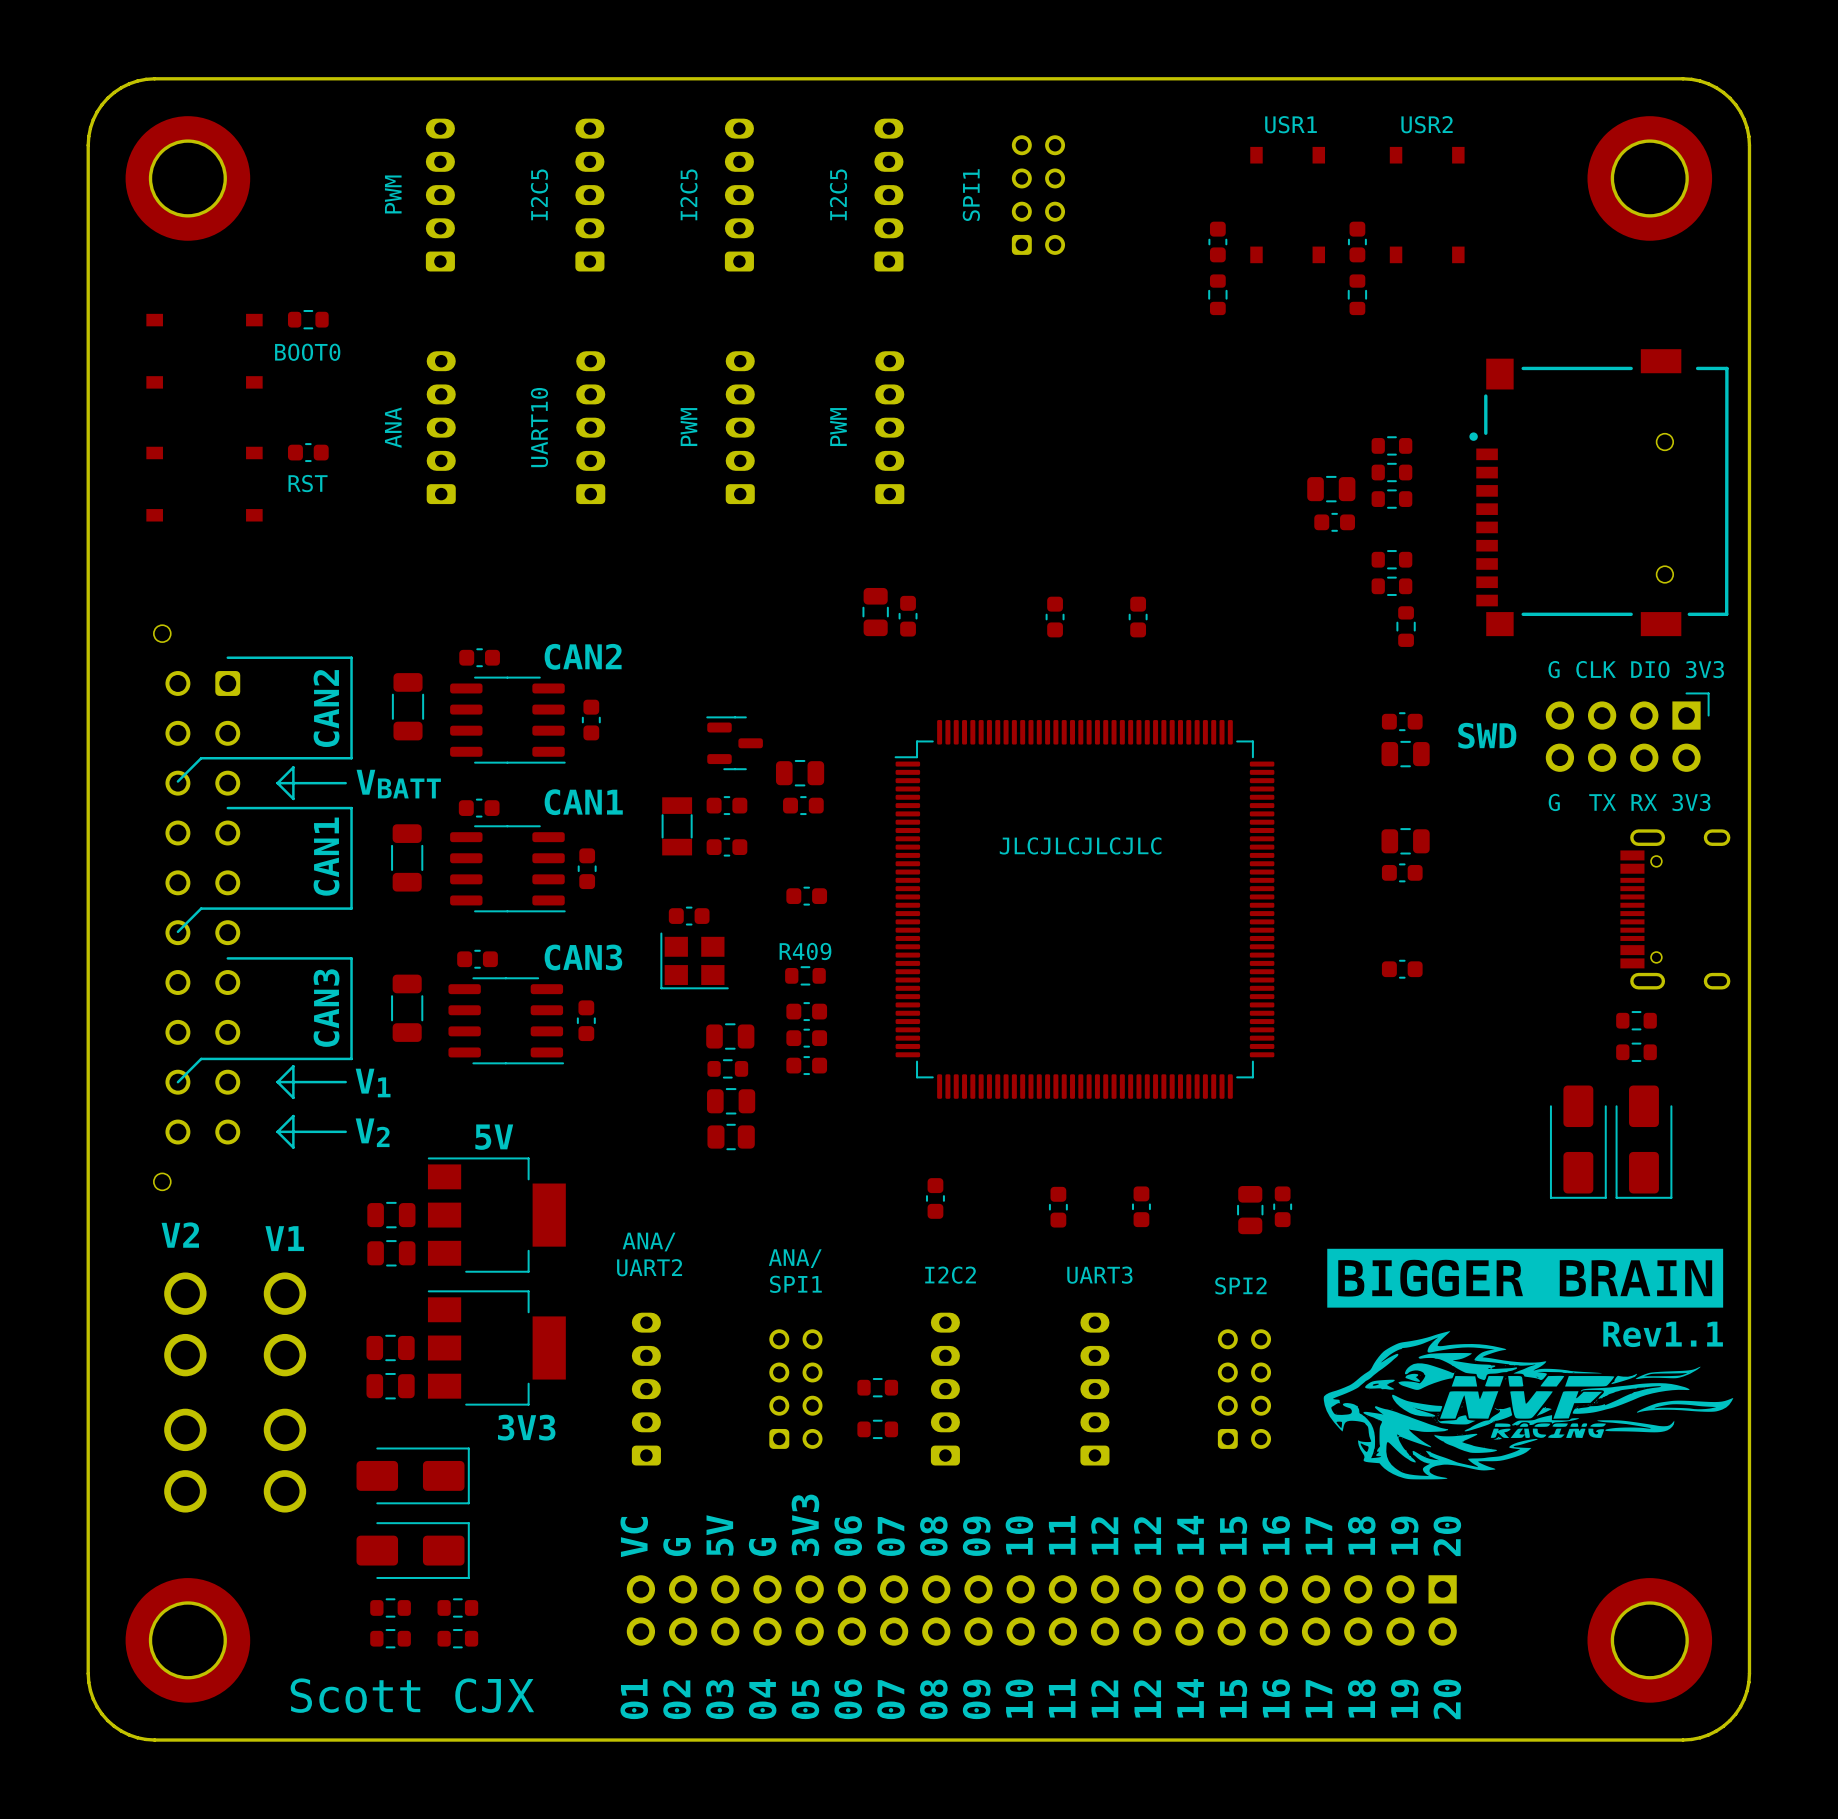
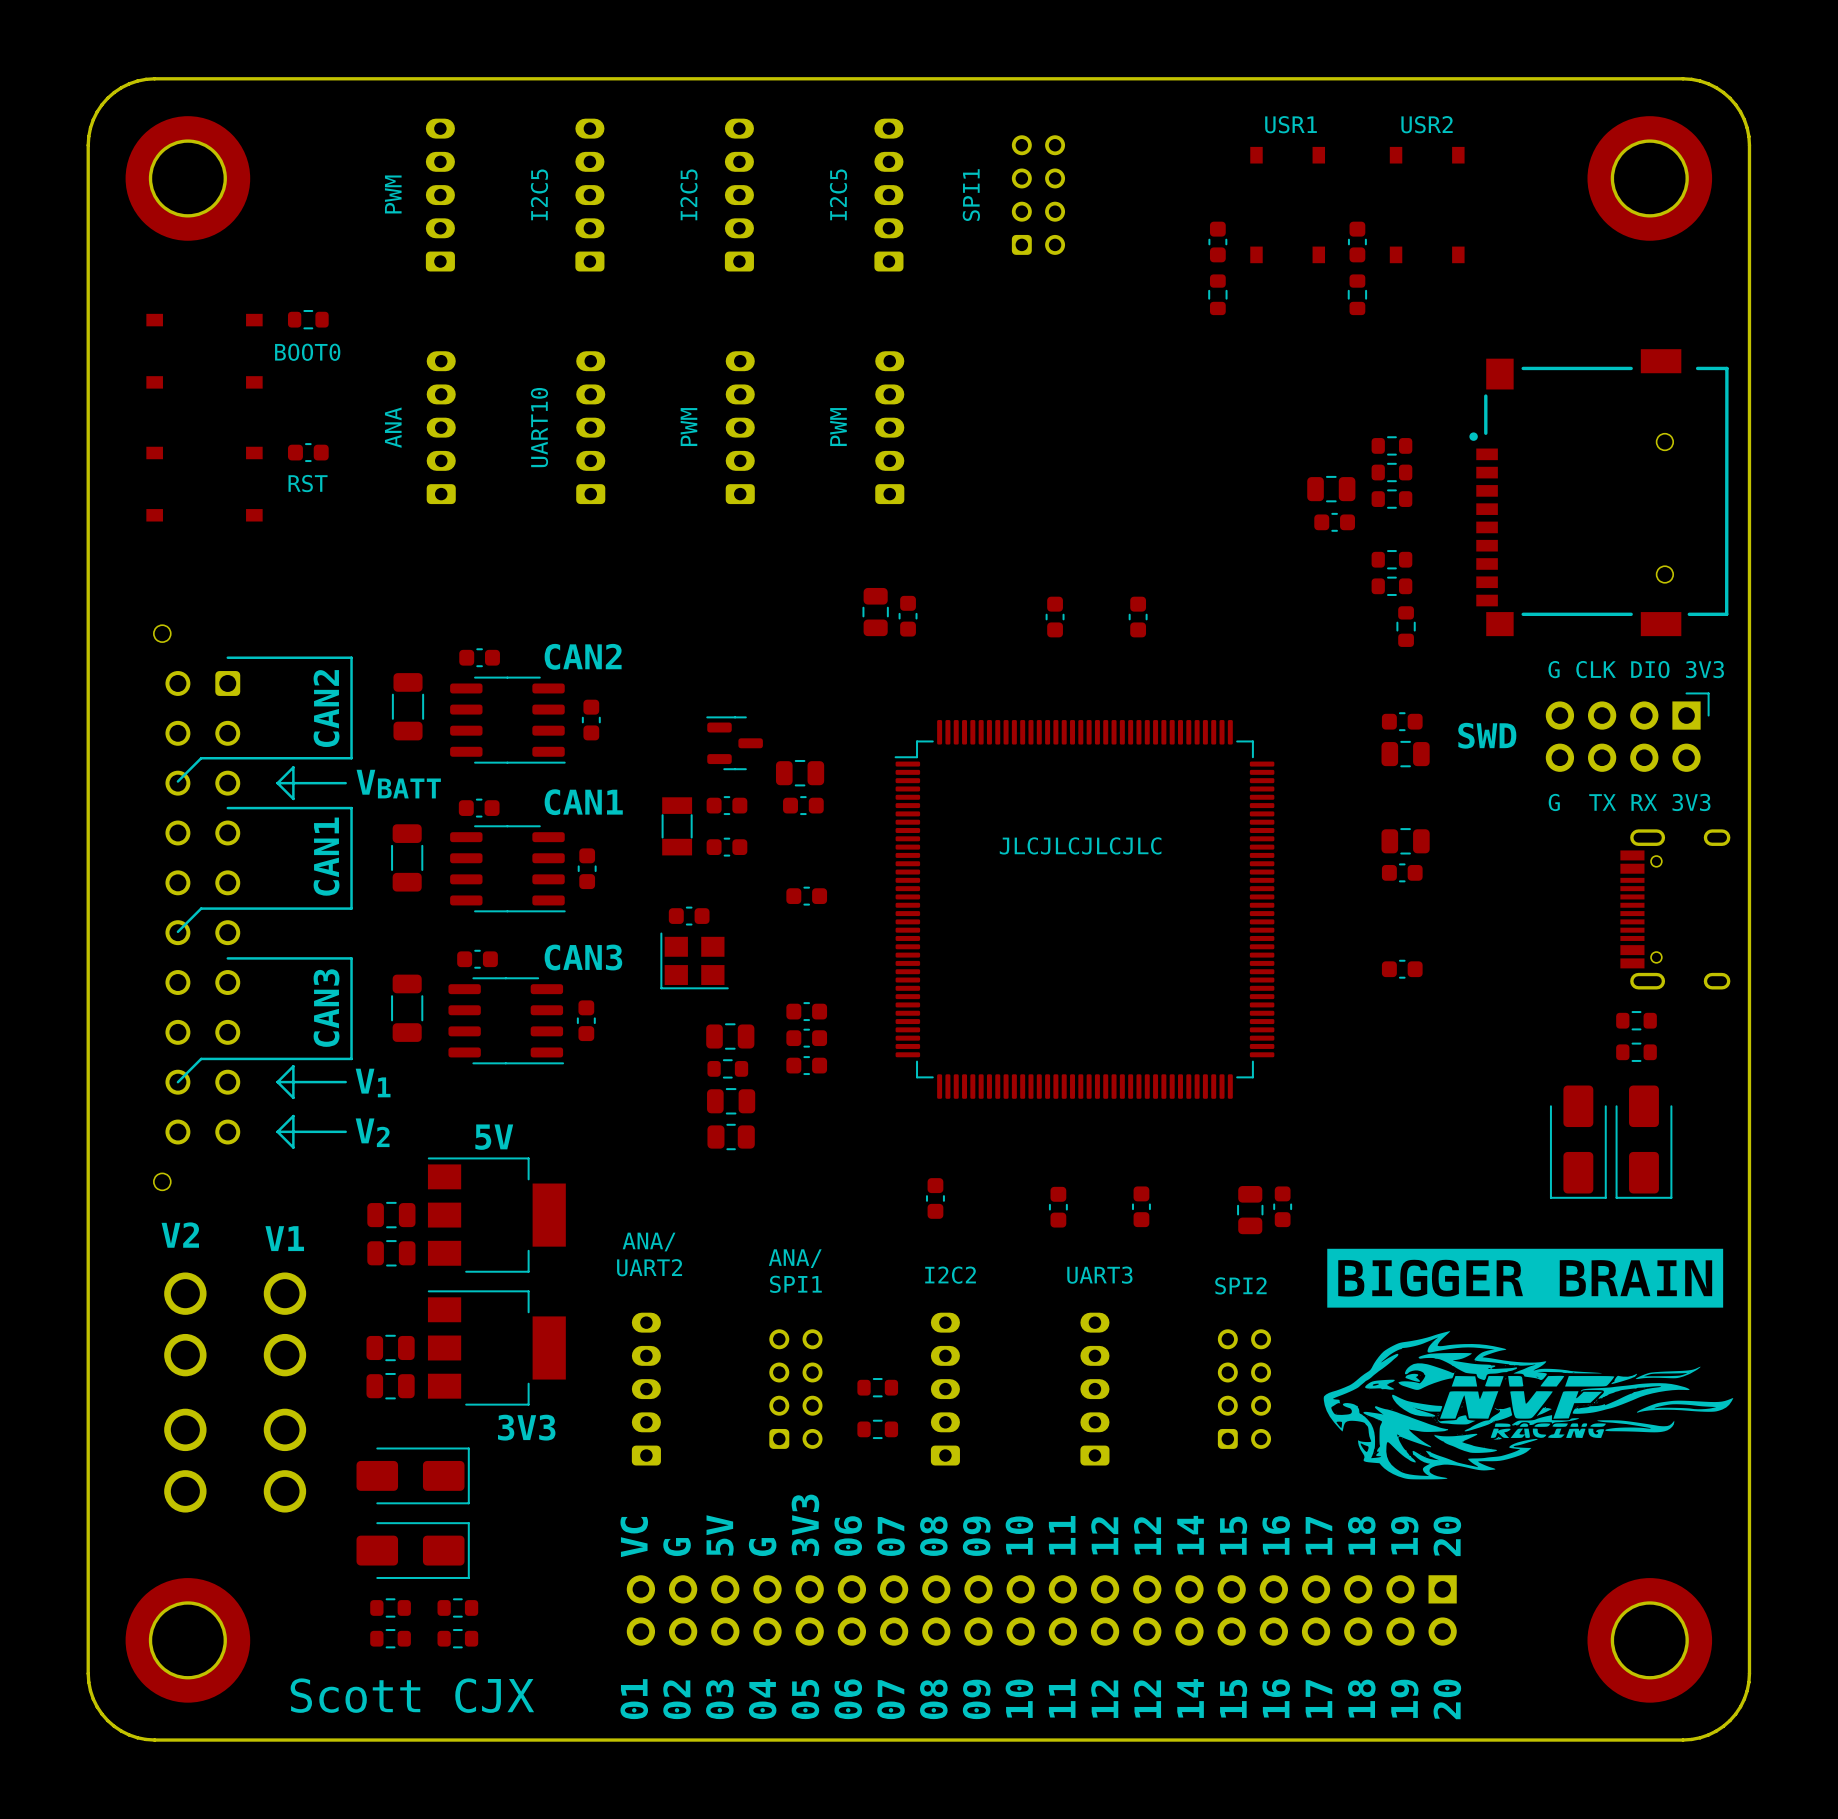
R409: (805, 975) -> none
text: Rev1.1 (1663, 1334) -> none

